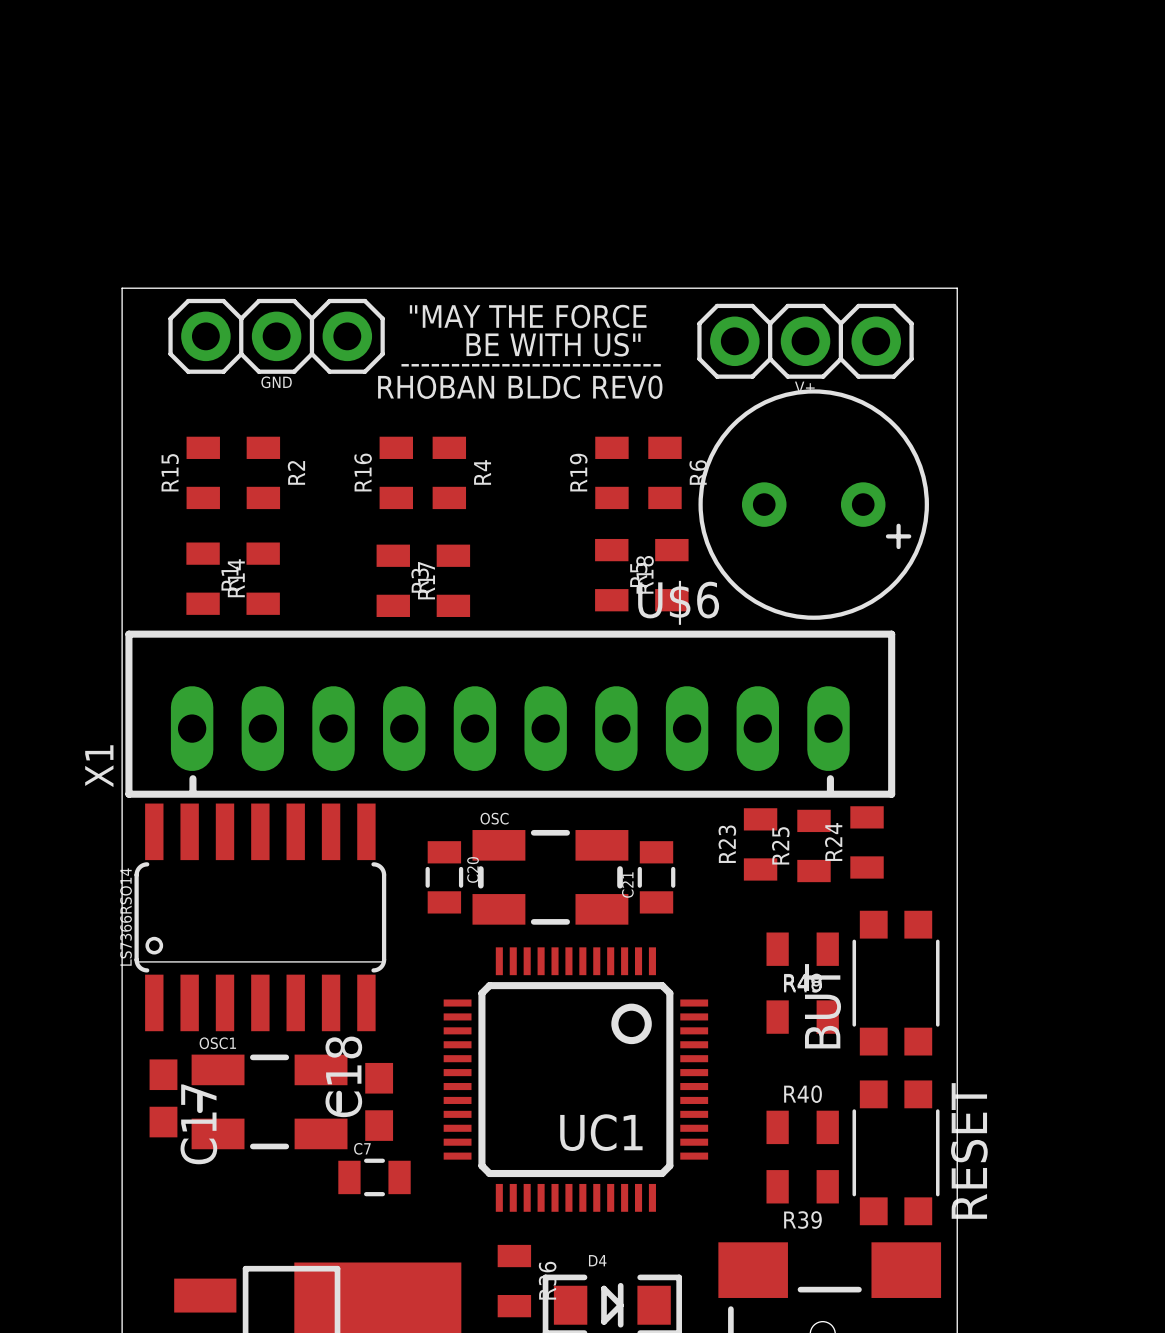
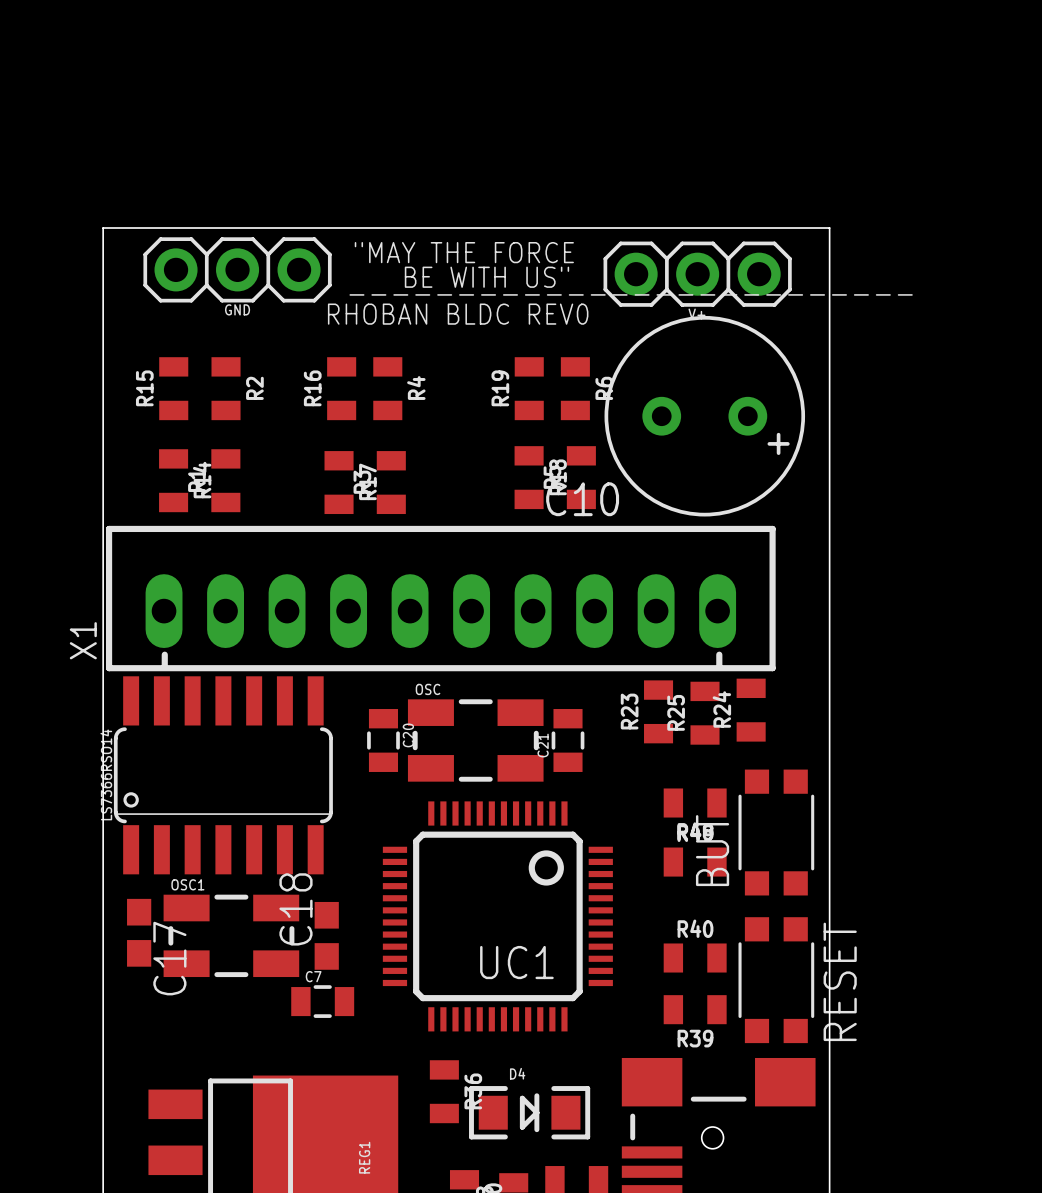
U$6 name: U$6 (678, 602) -> C10 (582, 499)

